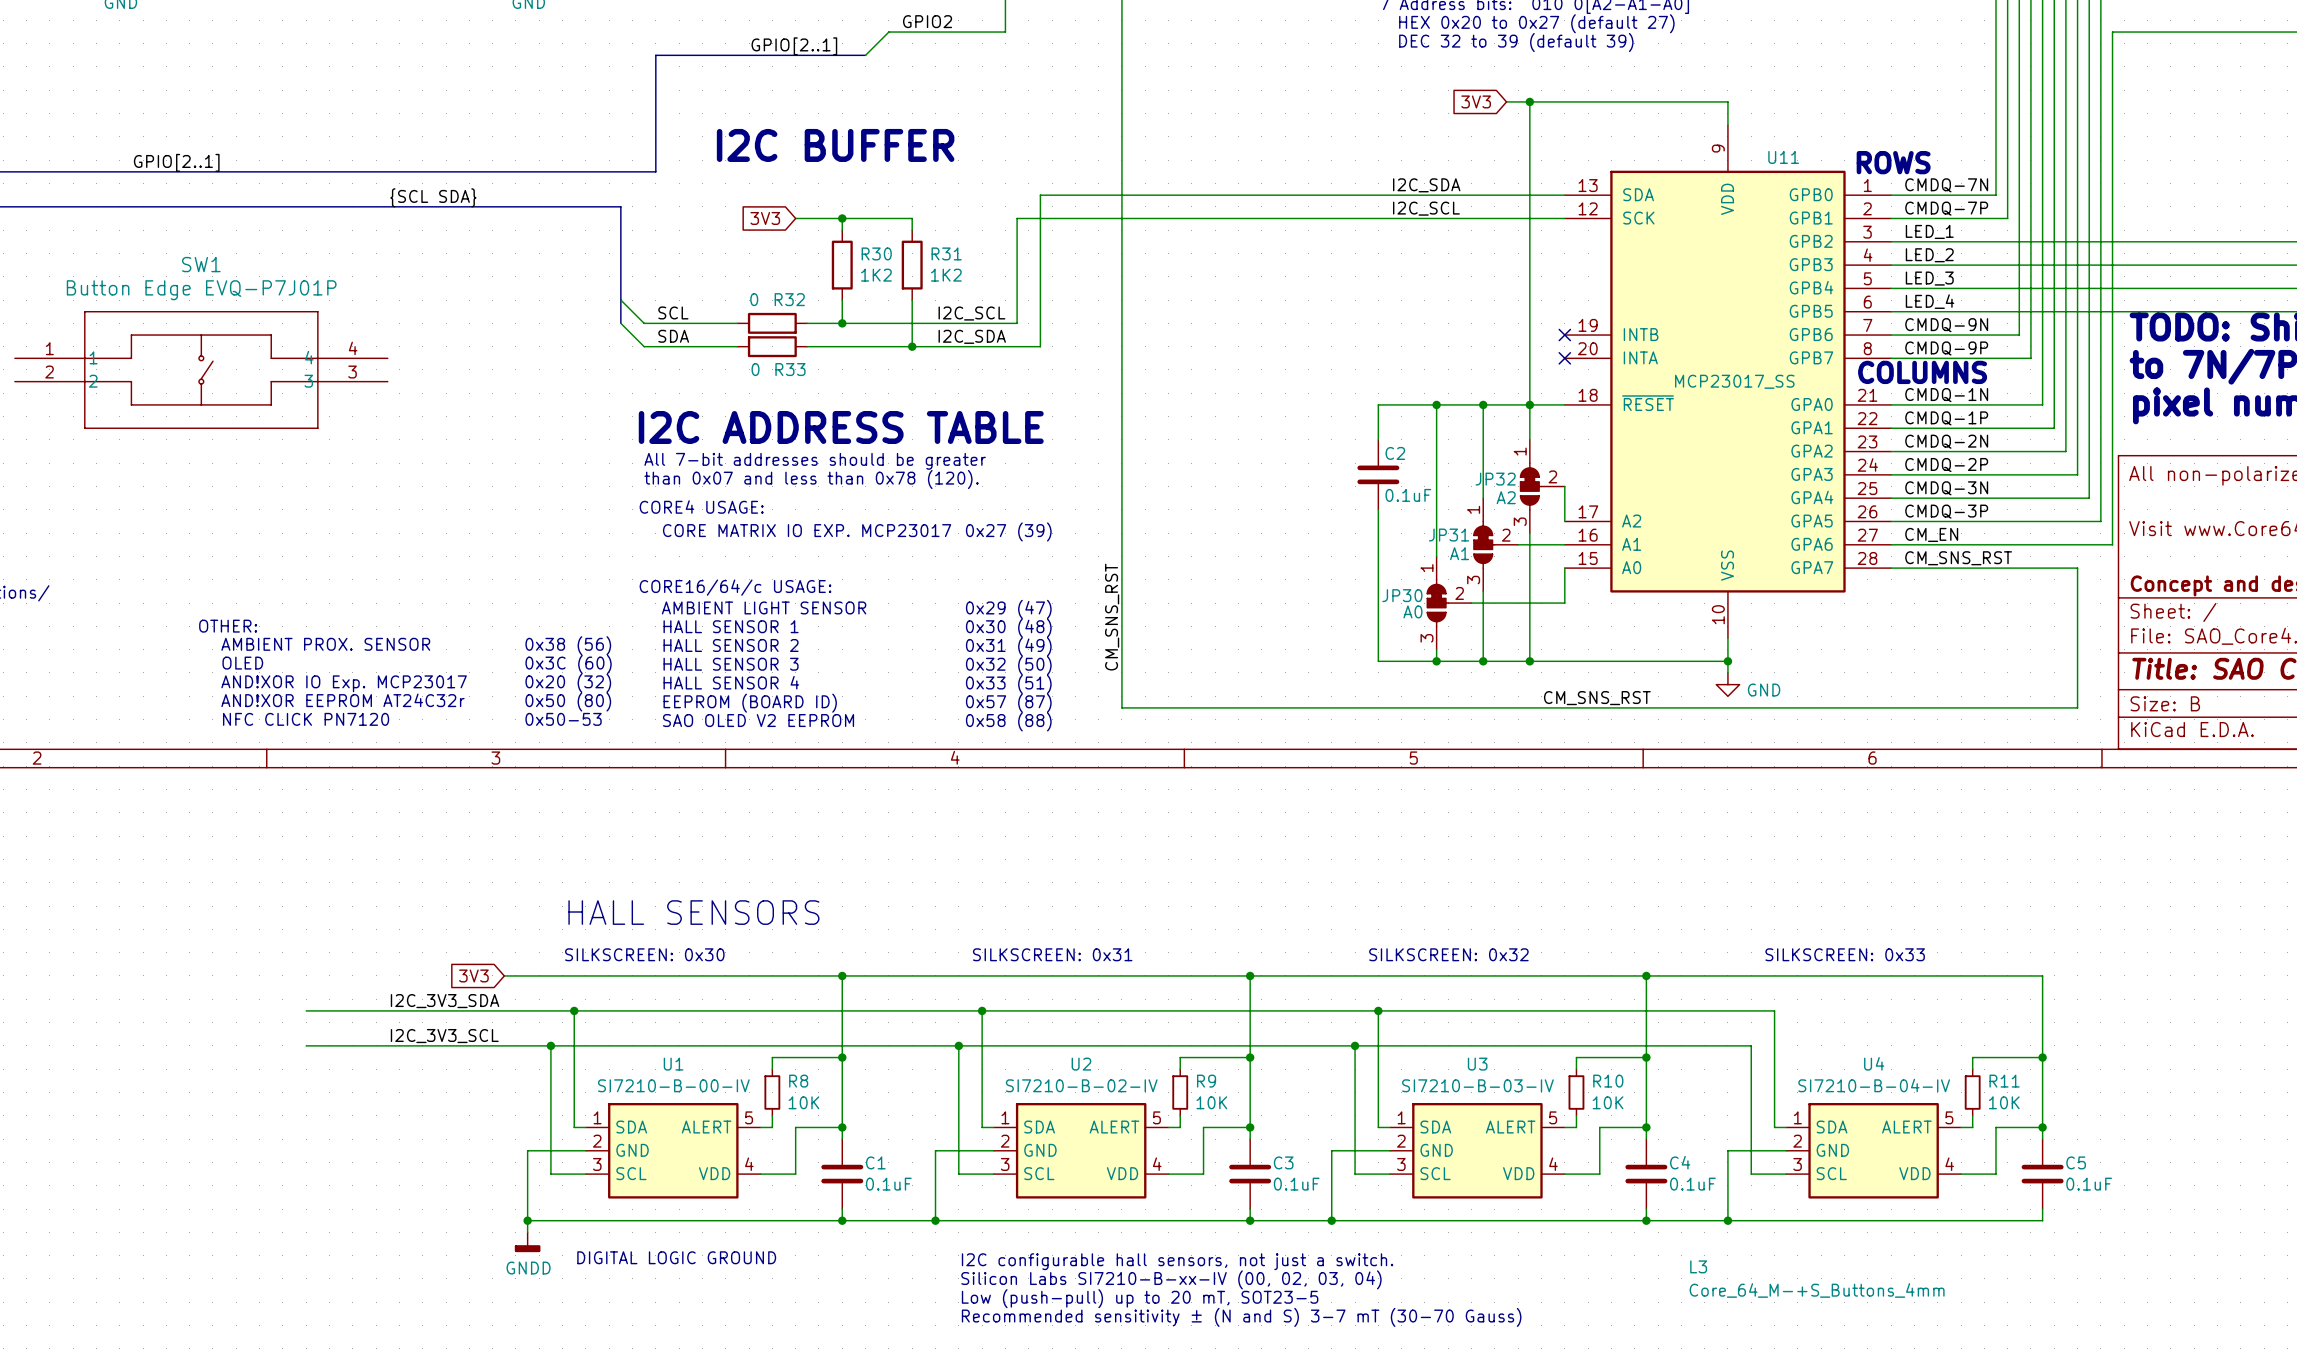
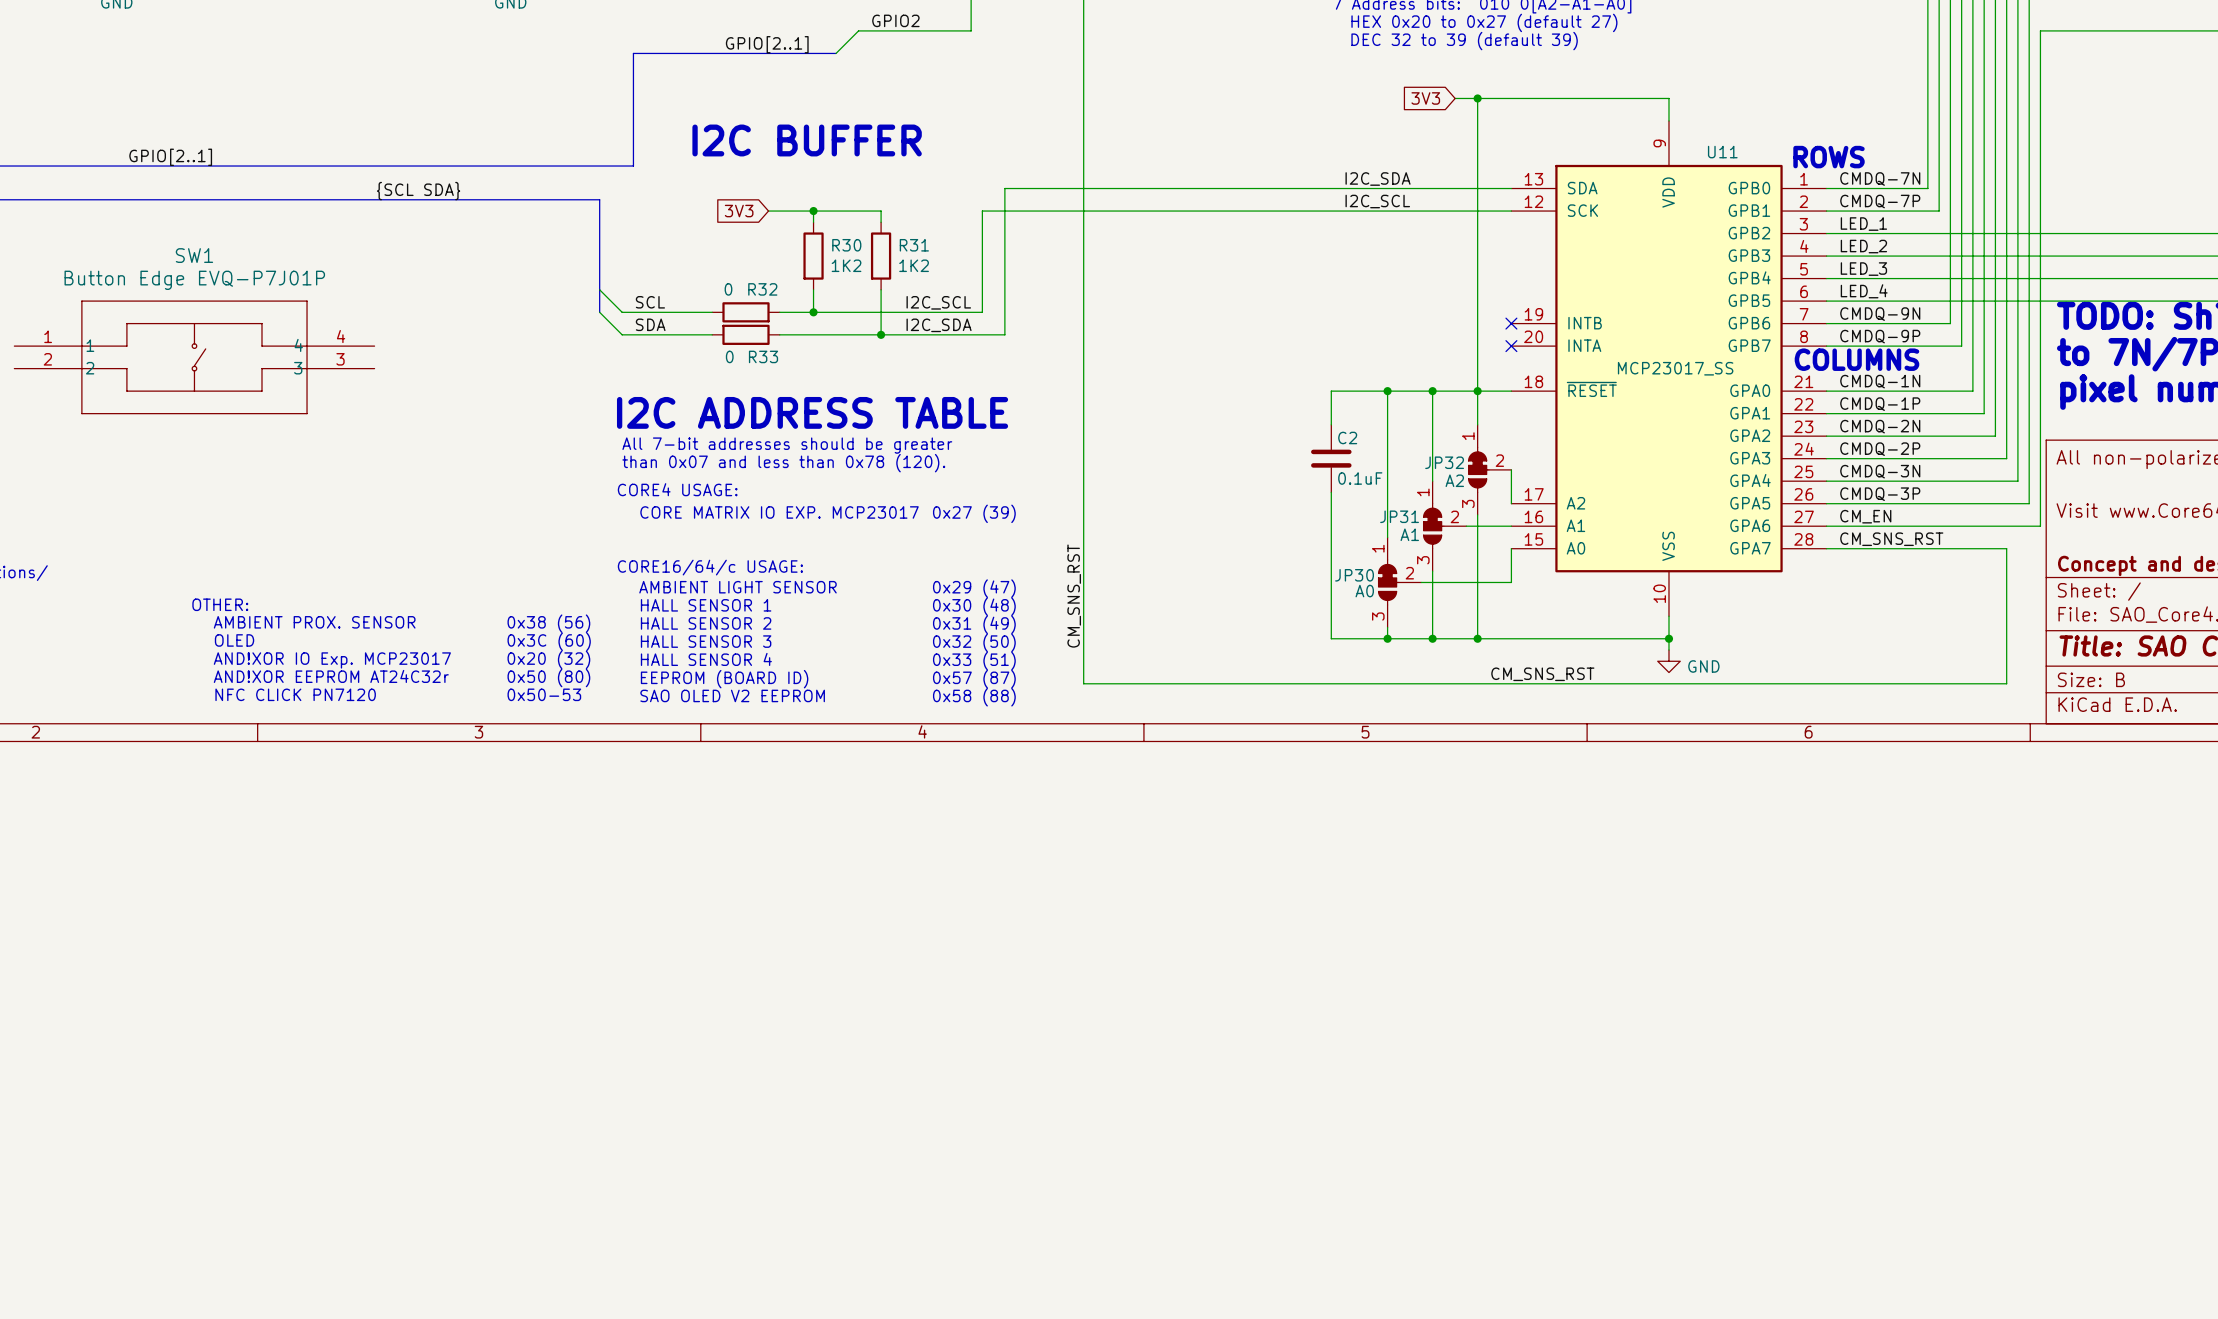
text: HALL SENSORS (693, 912) -> none
text: SILKSCREEN: 0x30 (644, 954) -> none
text: SILKSCREEN: 0x31 (1052, 954) -> none
text: SILKSCREEN: 0x32 (1448, 954) -> none
text: SILKSCREEN: 0x33 (1845, 954) -> none
global label: 3V3 (473, 975) -> none
wire: (504, 975) (2042, 975) (2042, 1139) -> none
wire: (842, 975) (842, 1139) -> none
junction: (842, 975) -> none
wire: (1250, 975) (1250, 1139) -> none
junction: (1250, 975) -> none
wire: (1646, 975) (1646, 1139) -> none
junction: (1646, 975) -> none
label: I2C_3V3_SDA (445, 1001) -> none
wire: (306, 1010) (1774, 1010) (1774, 1127) (1786, 1127) -> none
wire: (574, 1010) (574, 1127) (585, 1127) -> none
junction: (574, 1010) -> none
wire: (982, 1010) (982, 1127) (993, 1127) -> none
junction: (982, 1010) -> none
wire: (1378, 1010) (1378, 1127) (1390, 1127) -> none
junction: (1378, 1010) -> none
label: I2C_3V3_SCL (444, 1036) -> none
wire: (306, 1045) (1751, 1045) (1751, 1174) (1786, 1174) -> none
wire: (550, 1045) (550, 1174) (585, 1174) -> none
junction: (550, 1045) -> none
wire: (958, 1045) (958, 1174) (993, 1174) -> none
junction: (958, 1045) -> none
wire: (1355, 1045) (1355, 1174) (1390, 1174) -> none
junction: (1355, 1045) -> none
wire: (842, 1057) (772, 1057) (772, 1069) -> none
junction: (842, 1057) -> none
wire: (1250, 1057) (1180, 1057) (1180, 1069) -> none
junction: (1250, 1057) -> none
wire: (1646, 1057) (1576, 1057) (1576, 1069) -> none
junction: (1646, 1057) -> none
wire: (2042, 1057) (1972, 1057) (1972, 1069) -> none
junction: (2042, 1057) -> none
R8: 10K (772, 1092) -> none
R9: 10K (1180, 1092) -> none
R10: 10K (1576, 1092) -> none
R11: 10K (1972, 1092) -> none
wire: (772, 1115) (772, 1127) (760, 1127) -> none
wire: (1180, 1115) (1180, 1127) (1168, 1127) -> none
wire: (1576, 1115) (1576, 1127) (1564, 1127) -> none
wire: (1972, 1115) (1972, 1127) (1961, 1127) -> none
wire: (842, 1127) (795, 1127) (795, 1174) (760, 1174) -> none
junction: (842, 1127) -> none
wire: (1250, 1127) (1203, 1127) (1203, 1174) (1168, 1174) -> none
junction: (1250, 1127) -> none
wire: (1646, 1127) (1599, 1127) (1599, 1174) (1564, 1174) -> none
junction: (1646, 1127) -> none
wire: (2042, 1127) (1995, 1127) (1995, 1174) (1961, 1174) -> none
junction: (2042, 1127) -> none
wire: (585, 1150) (527, 1150) (527, 1232) -> none
U1: SI7210-B-00-IV (673, 1150) -> none
wire: (993, 1150) (935, 1150) (935, 1220) -> none
U2: SI7210-B-02-IV (1081, 1150) -> none
wire: (1390, 1150) (1331, 1150) (1331, 1220) -> none
U3: SI7210-B-03-IV (1477, 1150) -> none
wire: (1786, 1150) (1727, 1150) (1727, 1220) -> none
U4: SI7210-B-04-IV (1873, 1150) -> none
C1: 0.1uF (842, 1174) -> none
C3: 0.1uF (1250, 1174) -> none
C4: 0.1uF (1646, 1174) -> none
C5: 0.1uF (2042, 1174) -> none
wire: (842, 1209) (842, 1220) -> none
wire: (1250, 1209) (1250, 1220) -> none
wire: (1646, 1209) (1646, 1220) -> none
wire: (2042, 1209) (2042, 1220) (527, 1220) -> none
junction: (527, 1220) -> none
junction: (842, 1220) -> none
junction: (935, 1220) -> none
junction: (1250, 1220) -> none
junction: (1331, 1220) -> none
junction: (1646, 1220) -> none
junction: (1727, 1220) -> none
power symbol: GNDD (527, 1242) -> none
text: DIGITAL LOGIC GROUND (676, 1257) -> none
text: I2C configurable hall sensors, not just a switch. (1177, 1261) -> none
text: Silicon Labs SI7210-B-xx-IV (00, 02, 03, 04) (1171, 1279) -> none
L3: Core_64_M-+S_Buttons_4mm (1817, 1279) -> none
text: Low (push-pull) up to 20 mT, SOT23-5 (1140, 1298) -> none
text: Recommended sensitivity ± (N and S) 3-7 mT (30-70 Gauss) (1241, 1317) -> none

